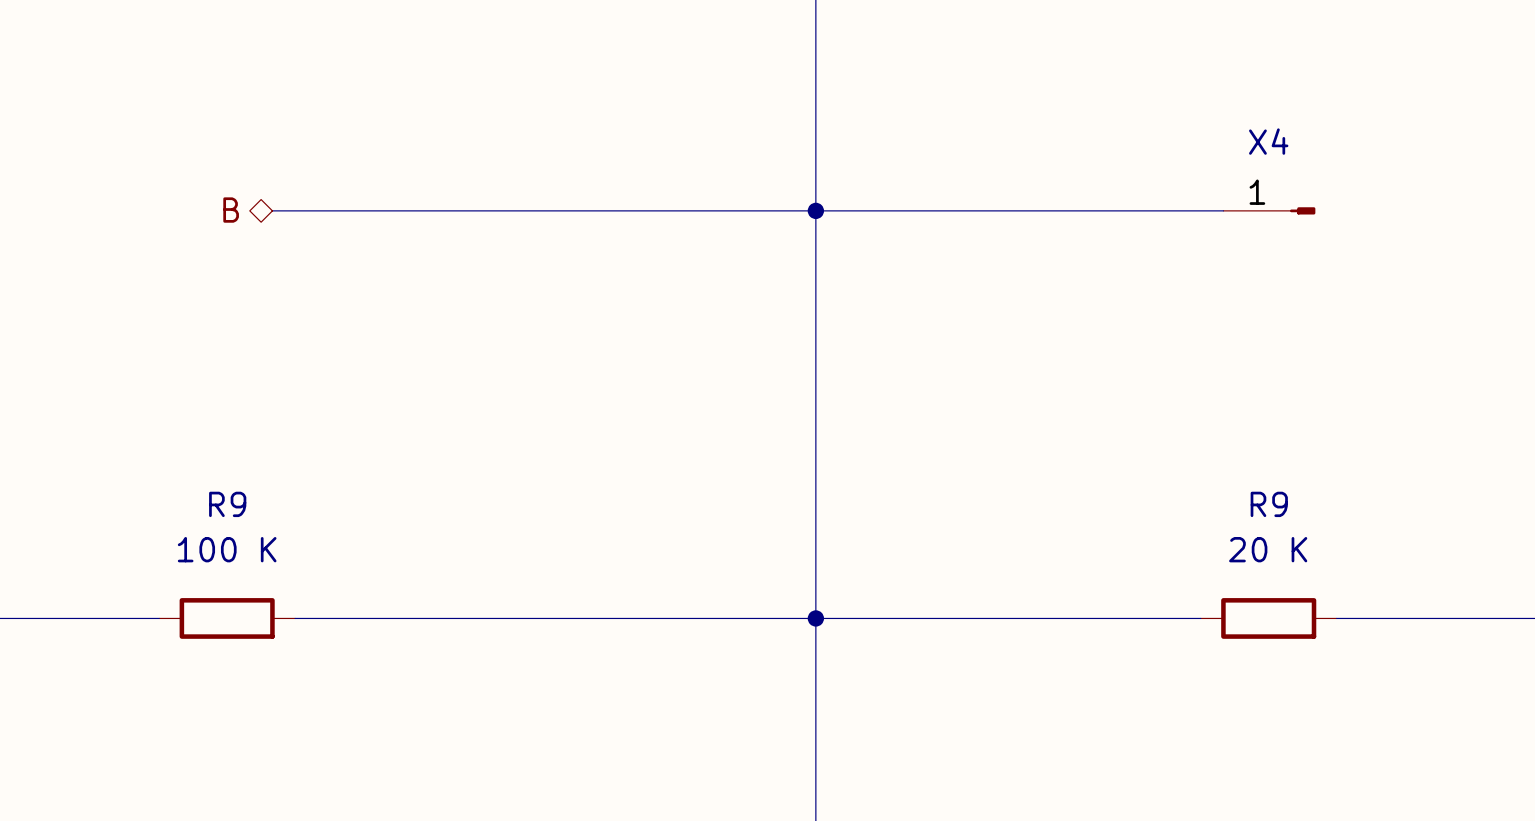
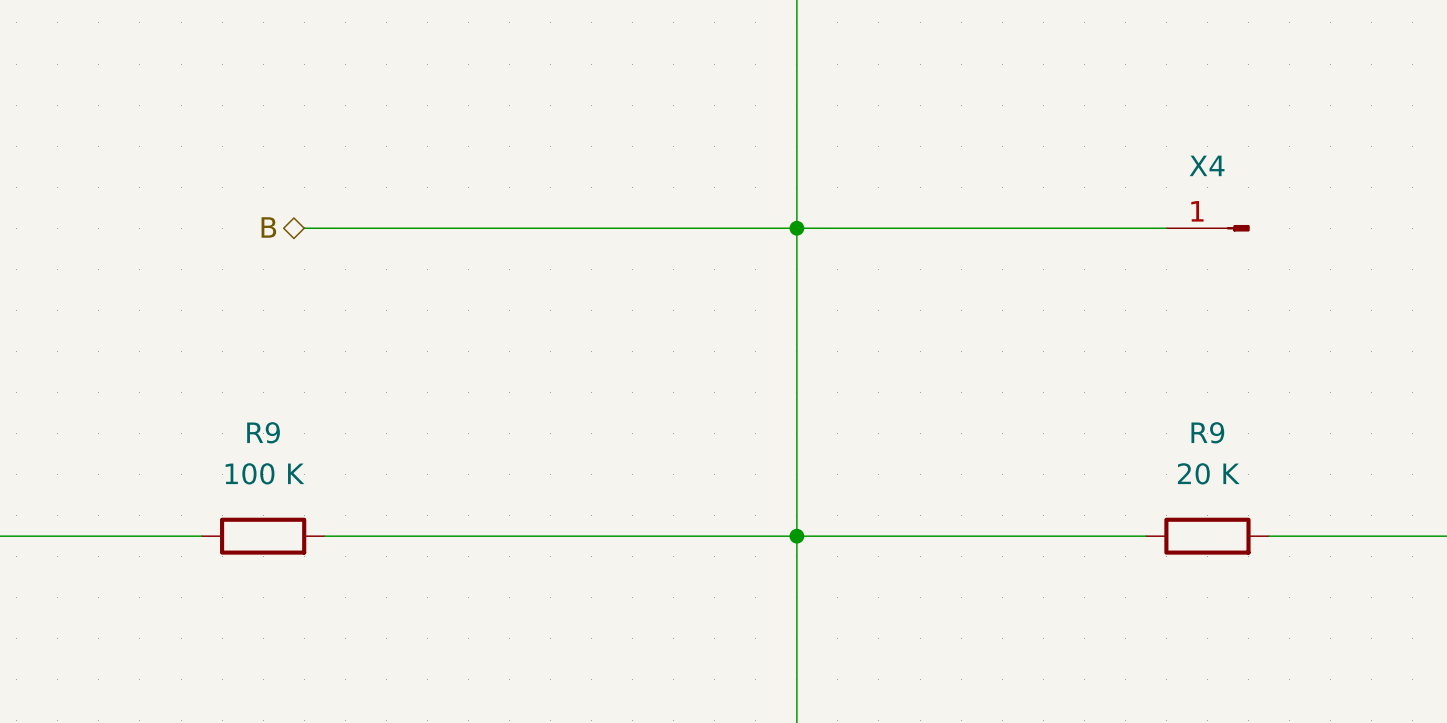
hierarchical label position: B (231, 210) -> B (268, 227)
wire: (272, 210) (1223, 210) -> (304, 228) (1166, 228)
junction position: (815, 210) -> (796, 228)
X4 position: (1269, 210) -> (1208, 228)

